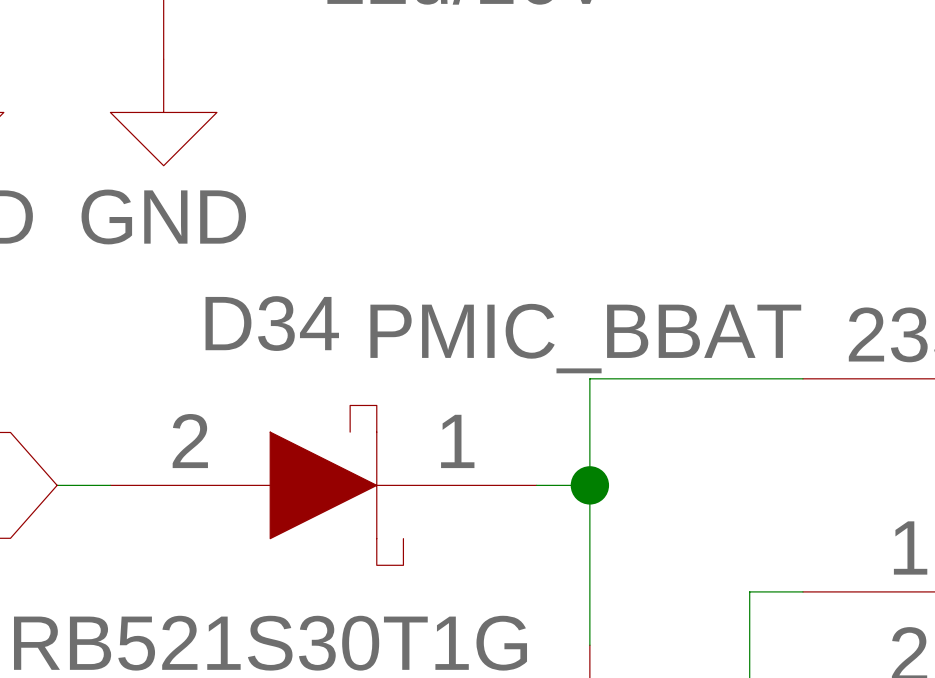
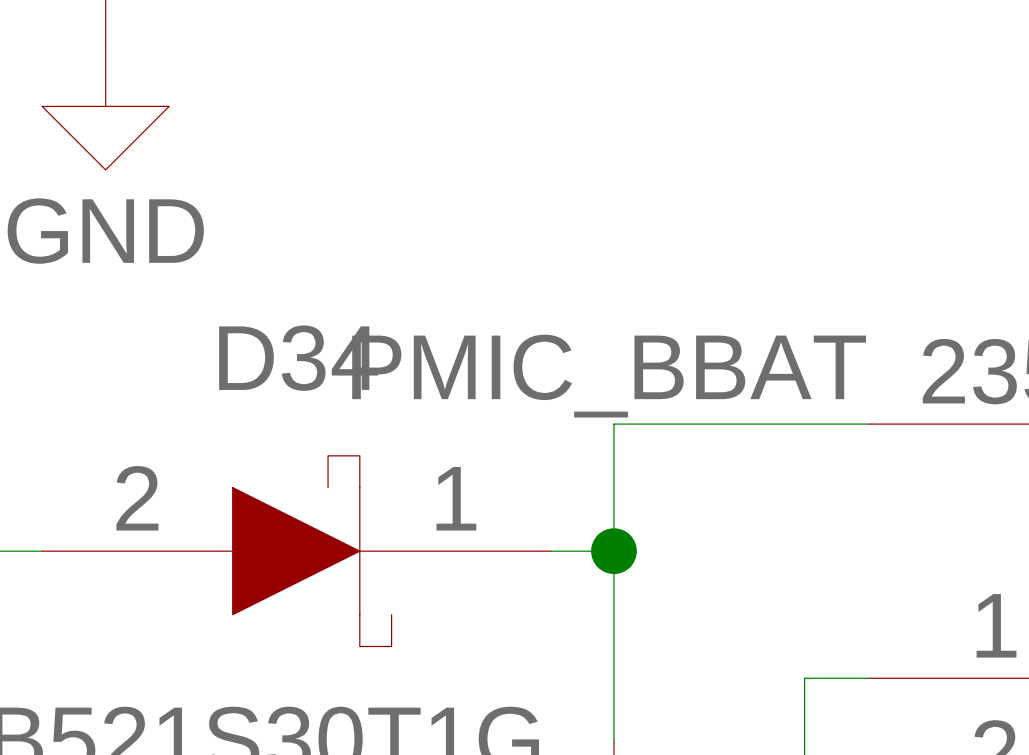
D34 name position: D34 (272, 323) -> D34 (298, 358)

